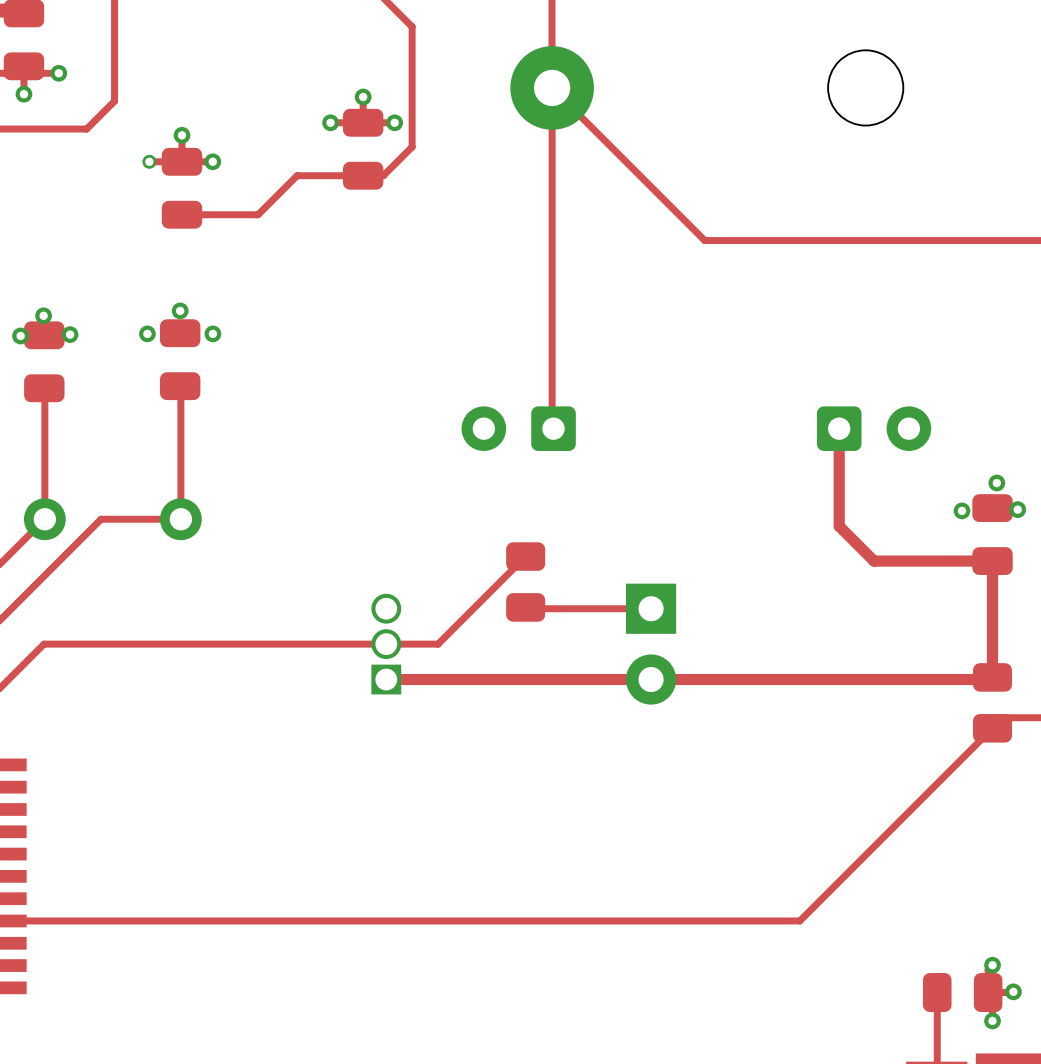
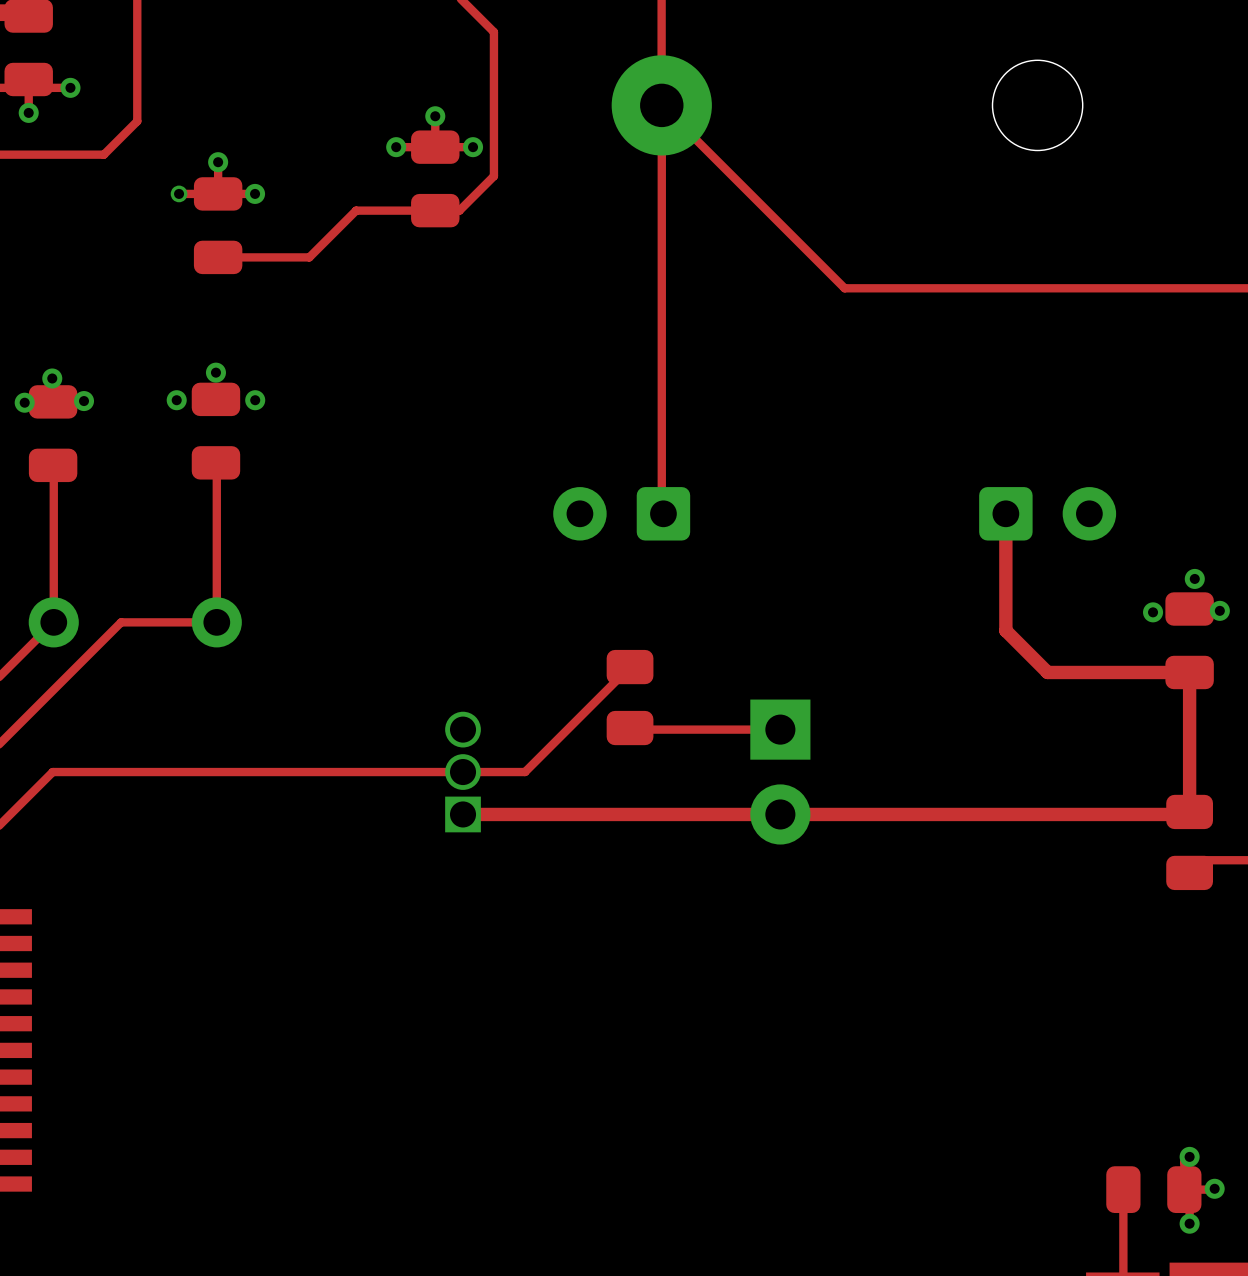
top track: (992, 728) (799, 920) (10, 920) -> none

